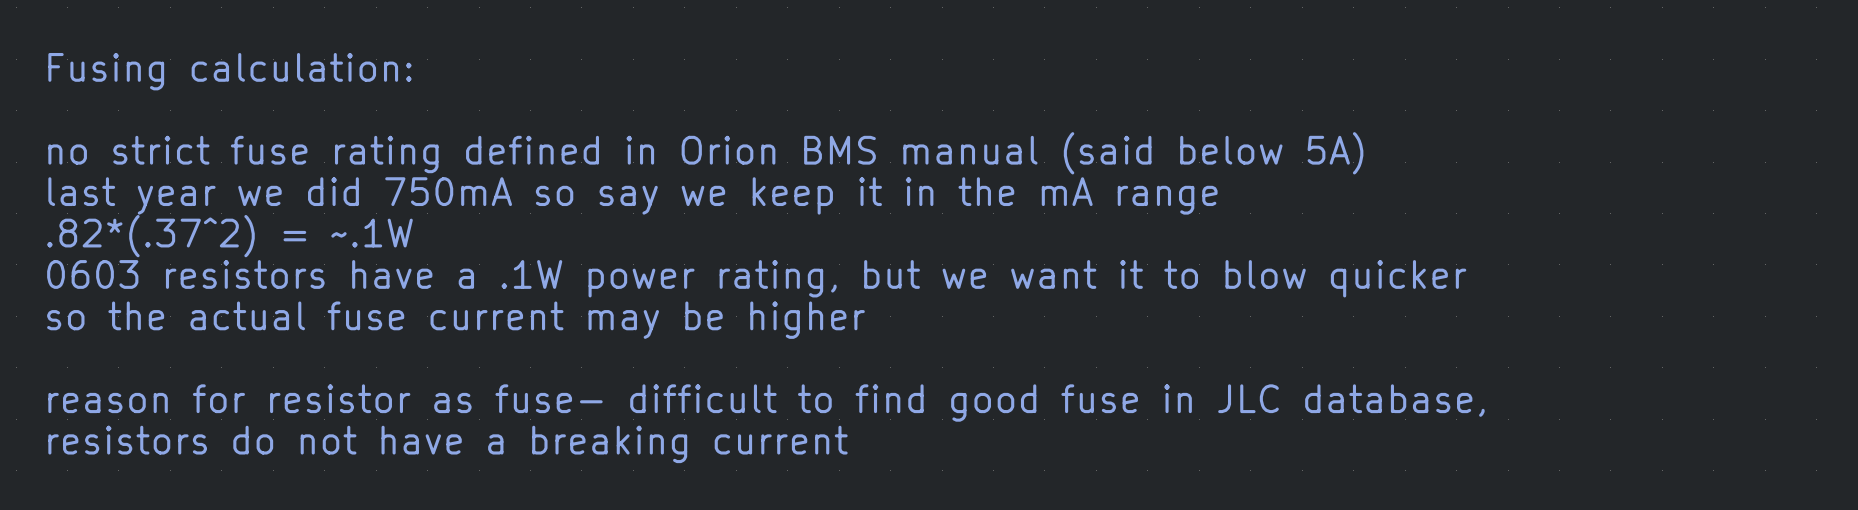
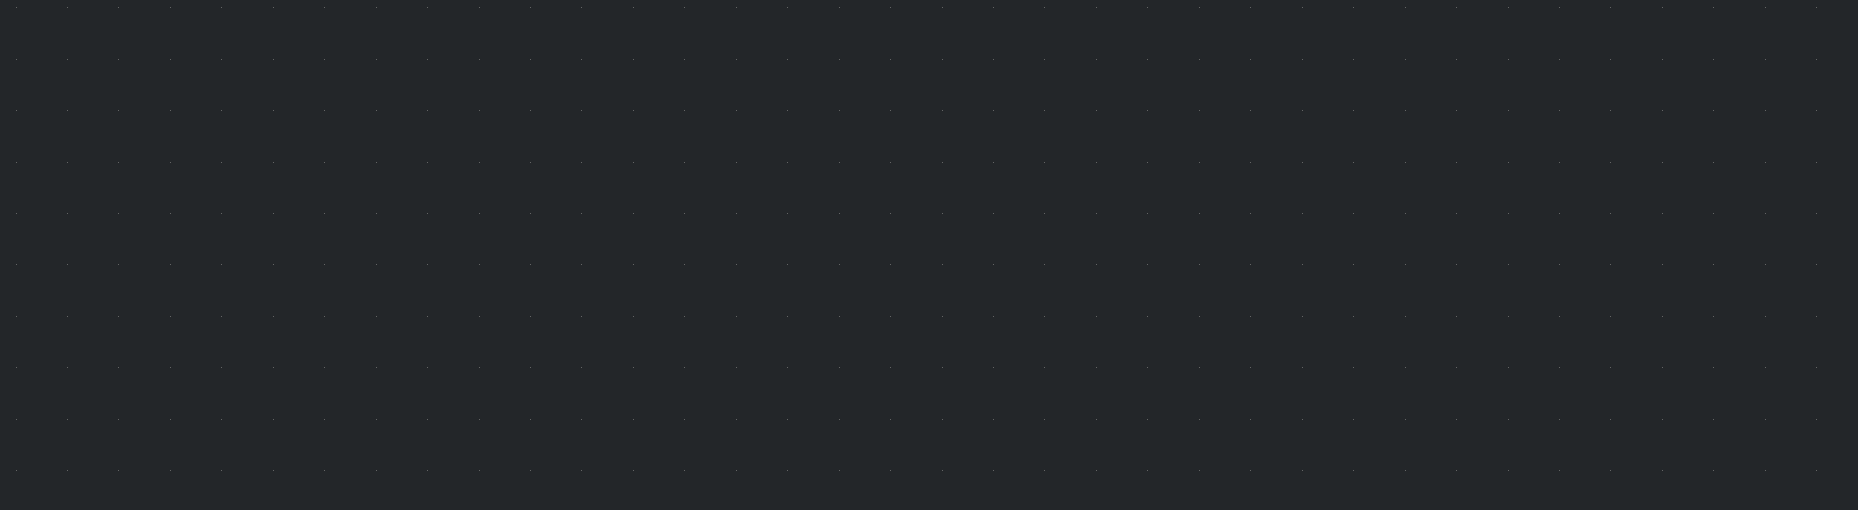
text: Fusing calculation: (229, 71) -> none
text: no strict fuse rating defined in Orion BMS manual (said below 5A) (705, 153) -> none
text: last year we did 750mA so say we keep it in the mA range (632, 195) -> none
text: .82*(.37^2) = ~.1W (229, 236) -> none
text: 0603 resistors have a .1W power rating, but we want it to blow quicker (756, 278) -> none
text: so the actual fuse current may be higher (455, 320) -> none
text: reason for resistor as fuse- difficult to find good fuse in JLC database, (766, 403) -> none
text: resistors do not have a breaking current (447, 444) -> none

